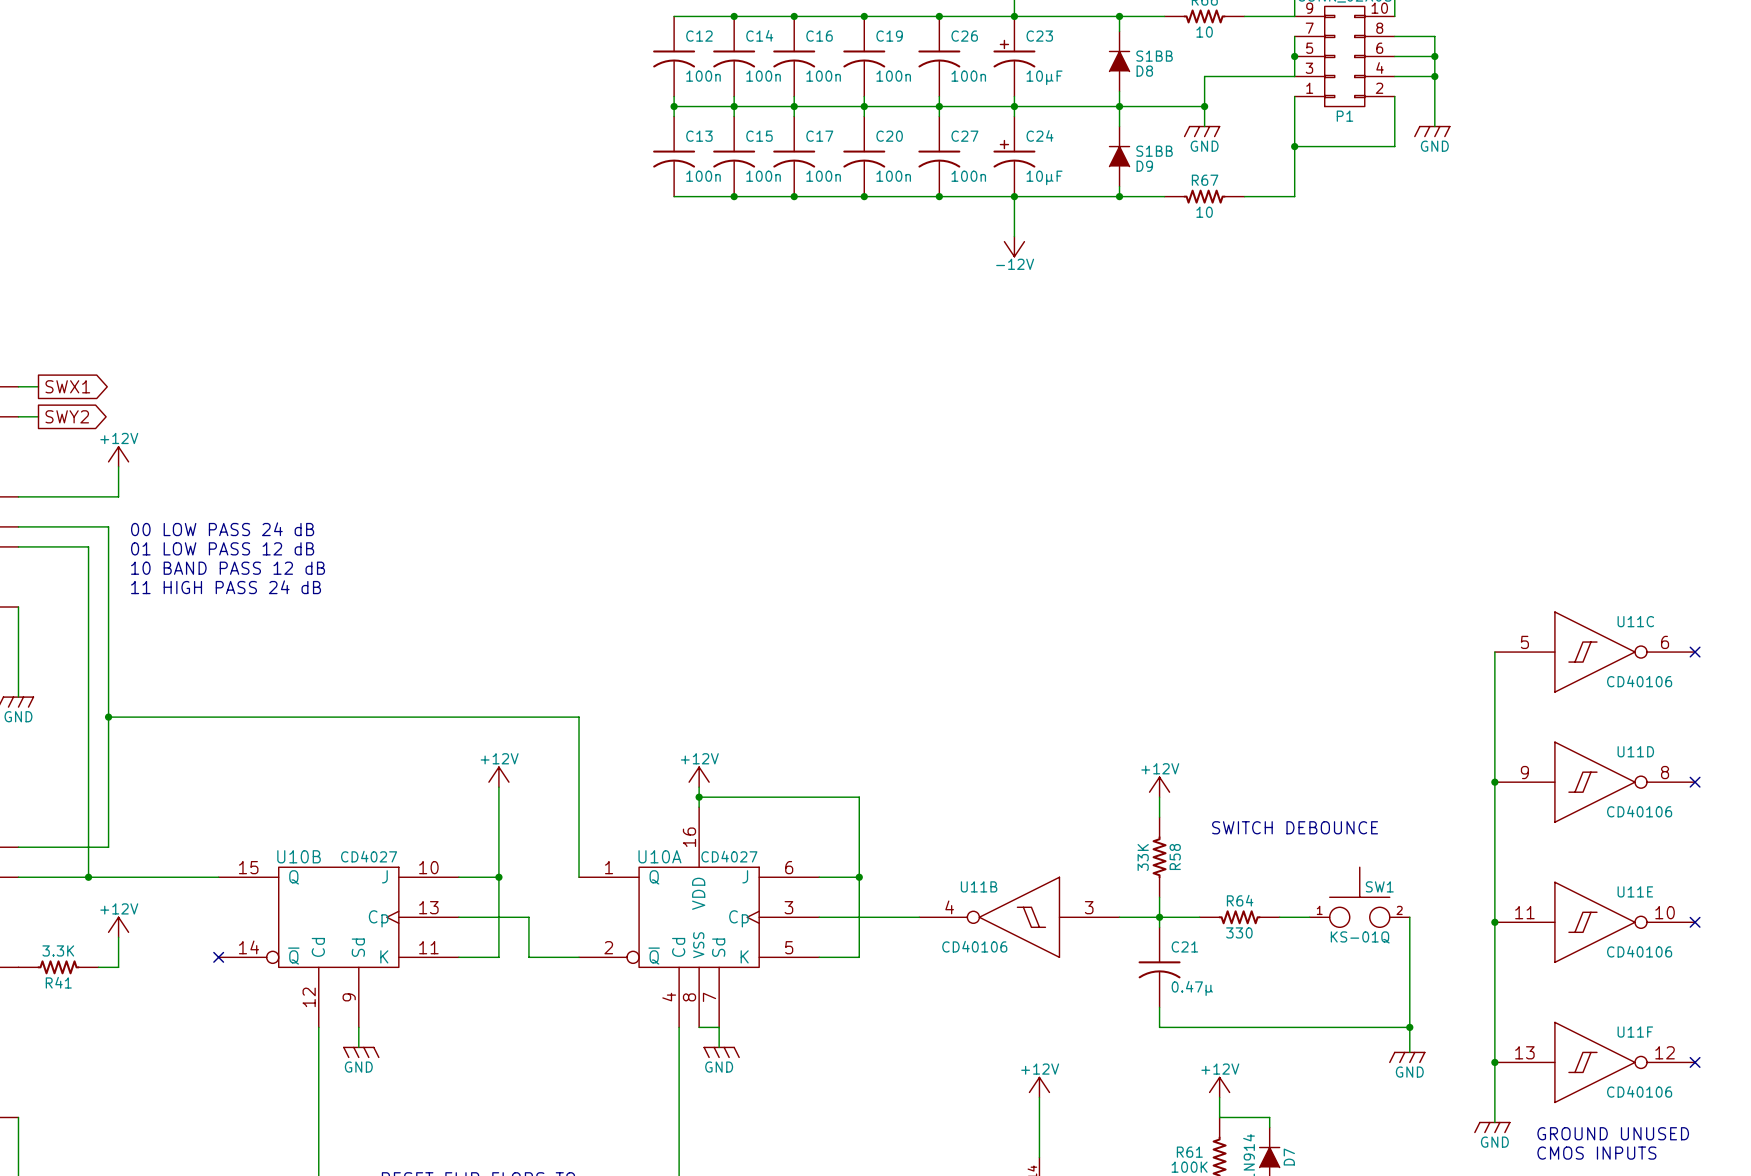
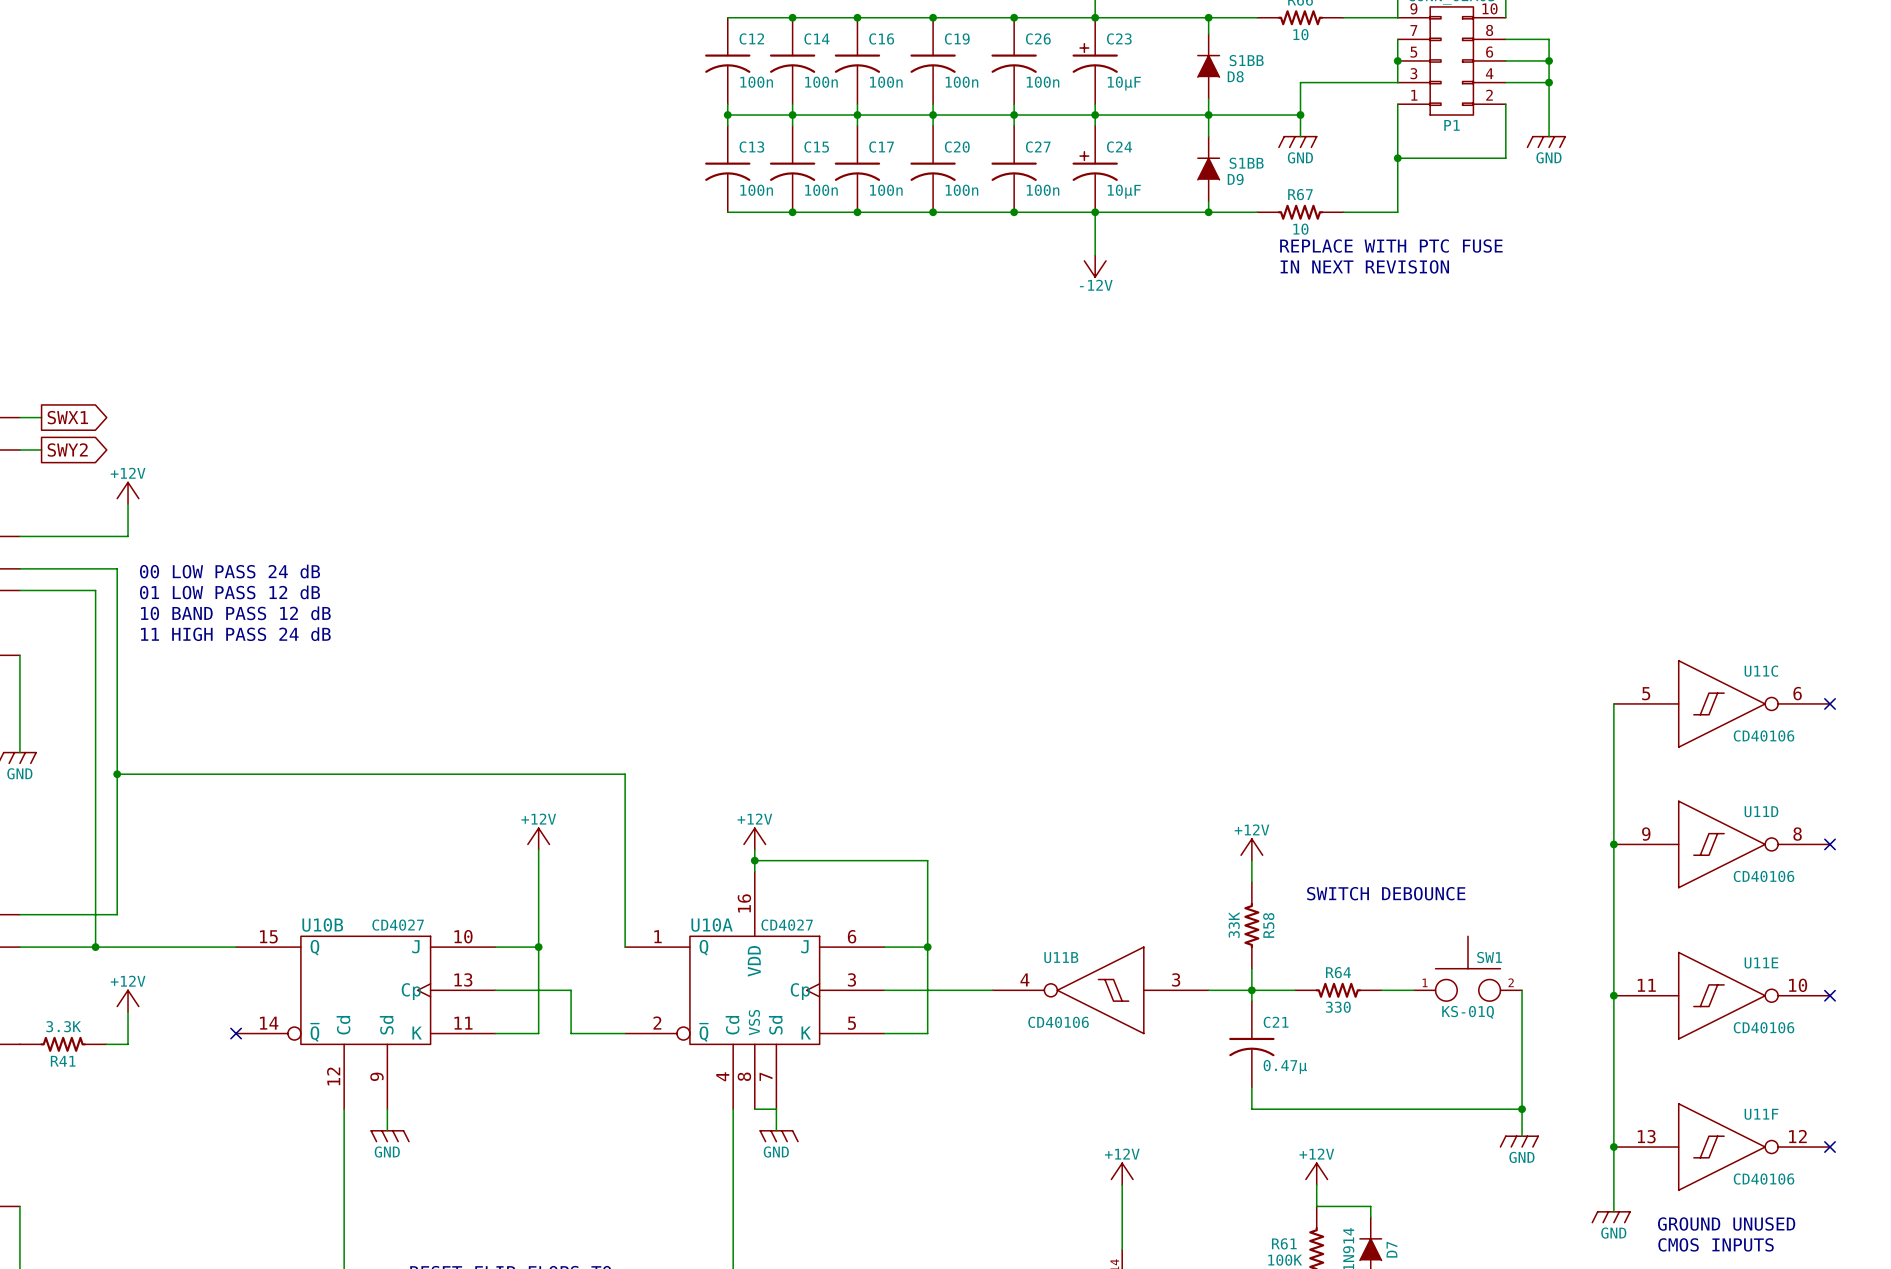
text: none -> REPLACE WITH PTC FUSE (1391, 246)
text: none -> IN NEXT REVISION (1364, 266)

